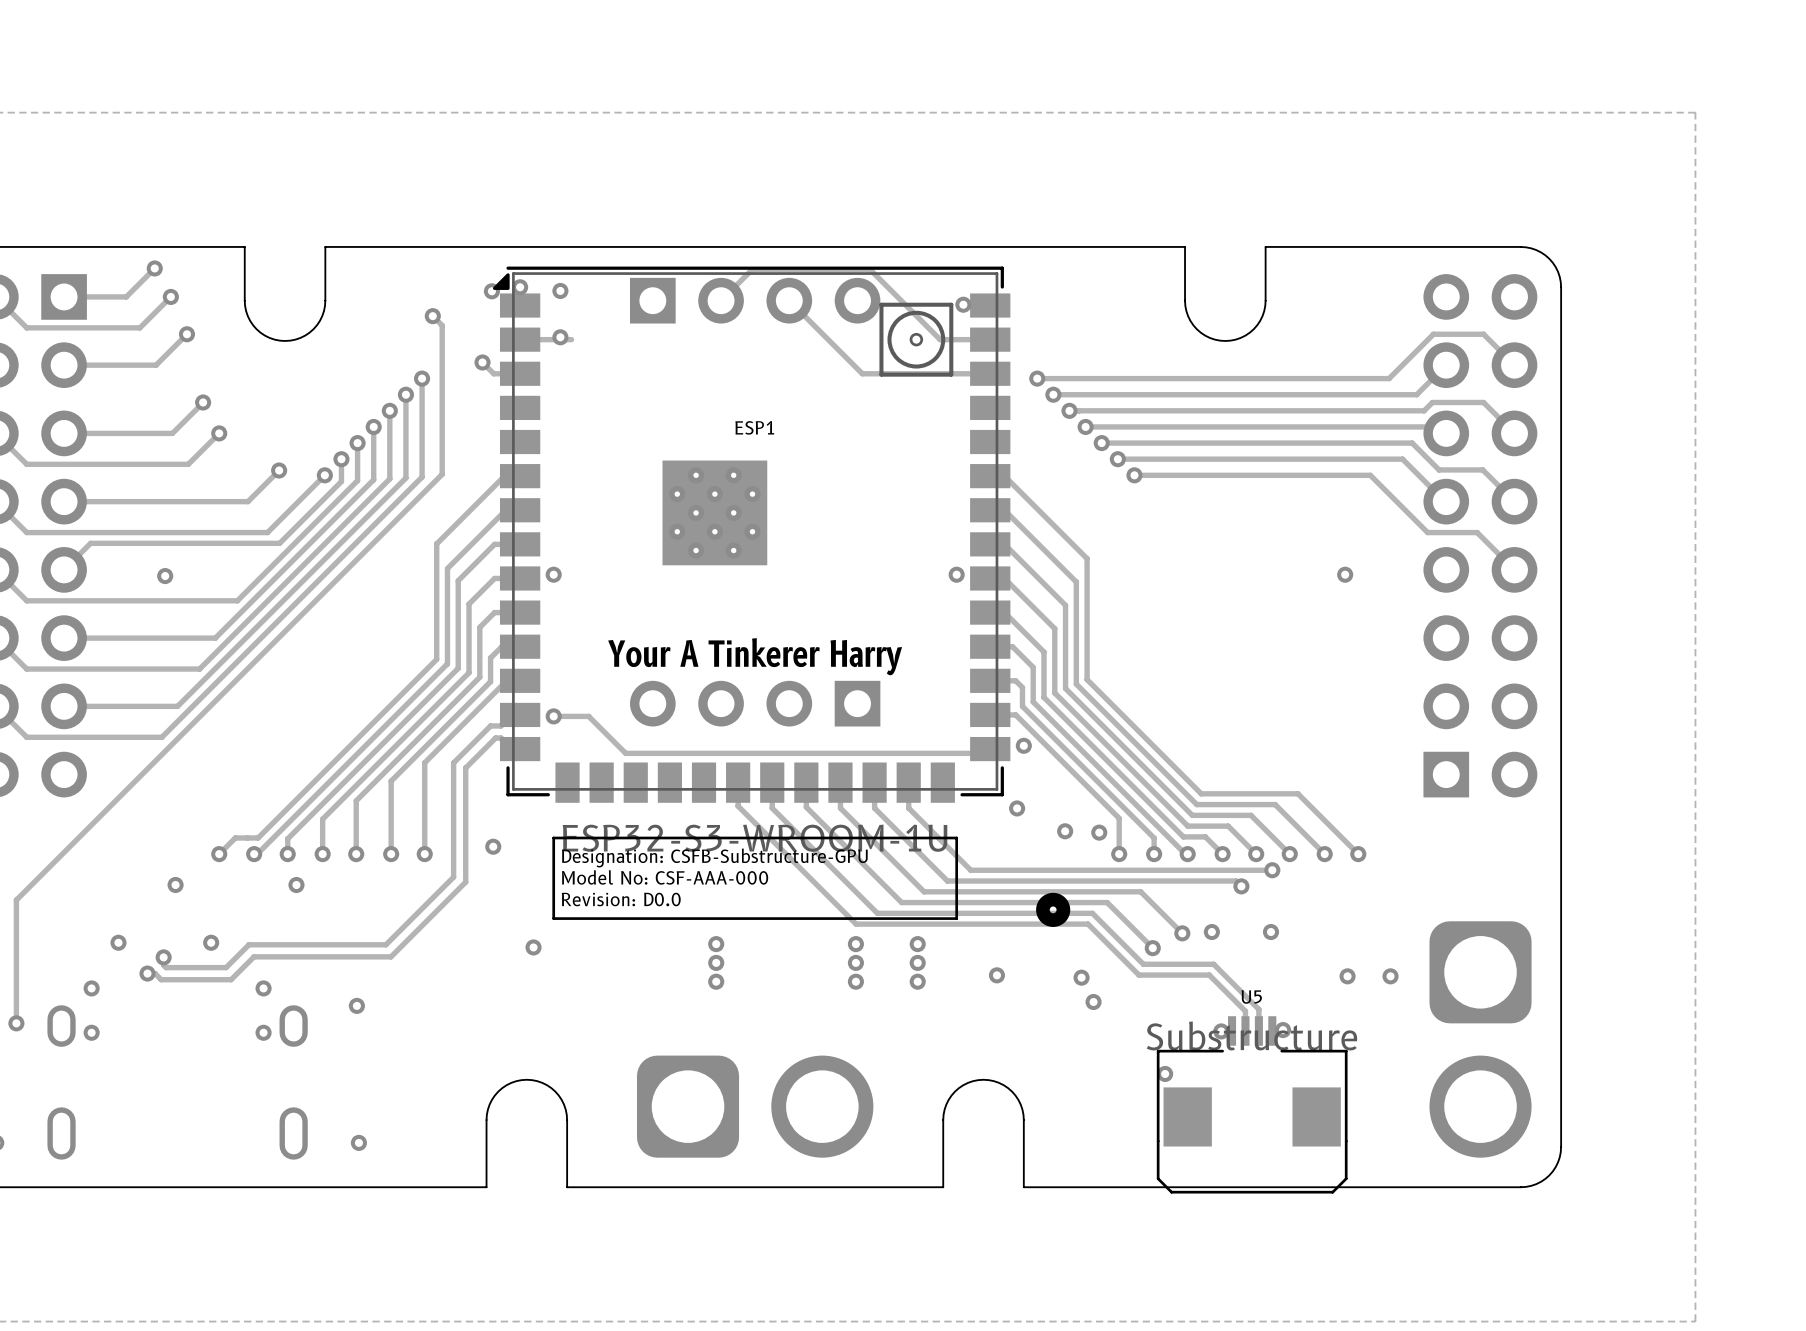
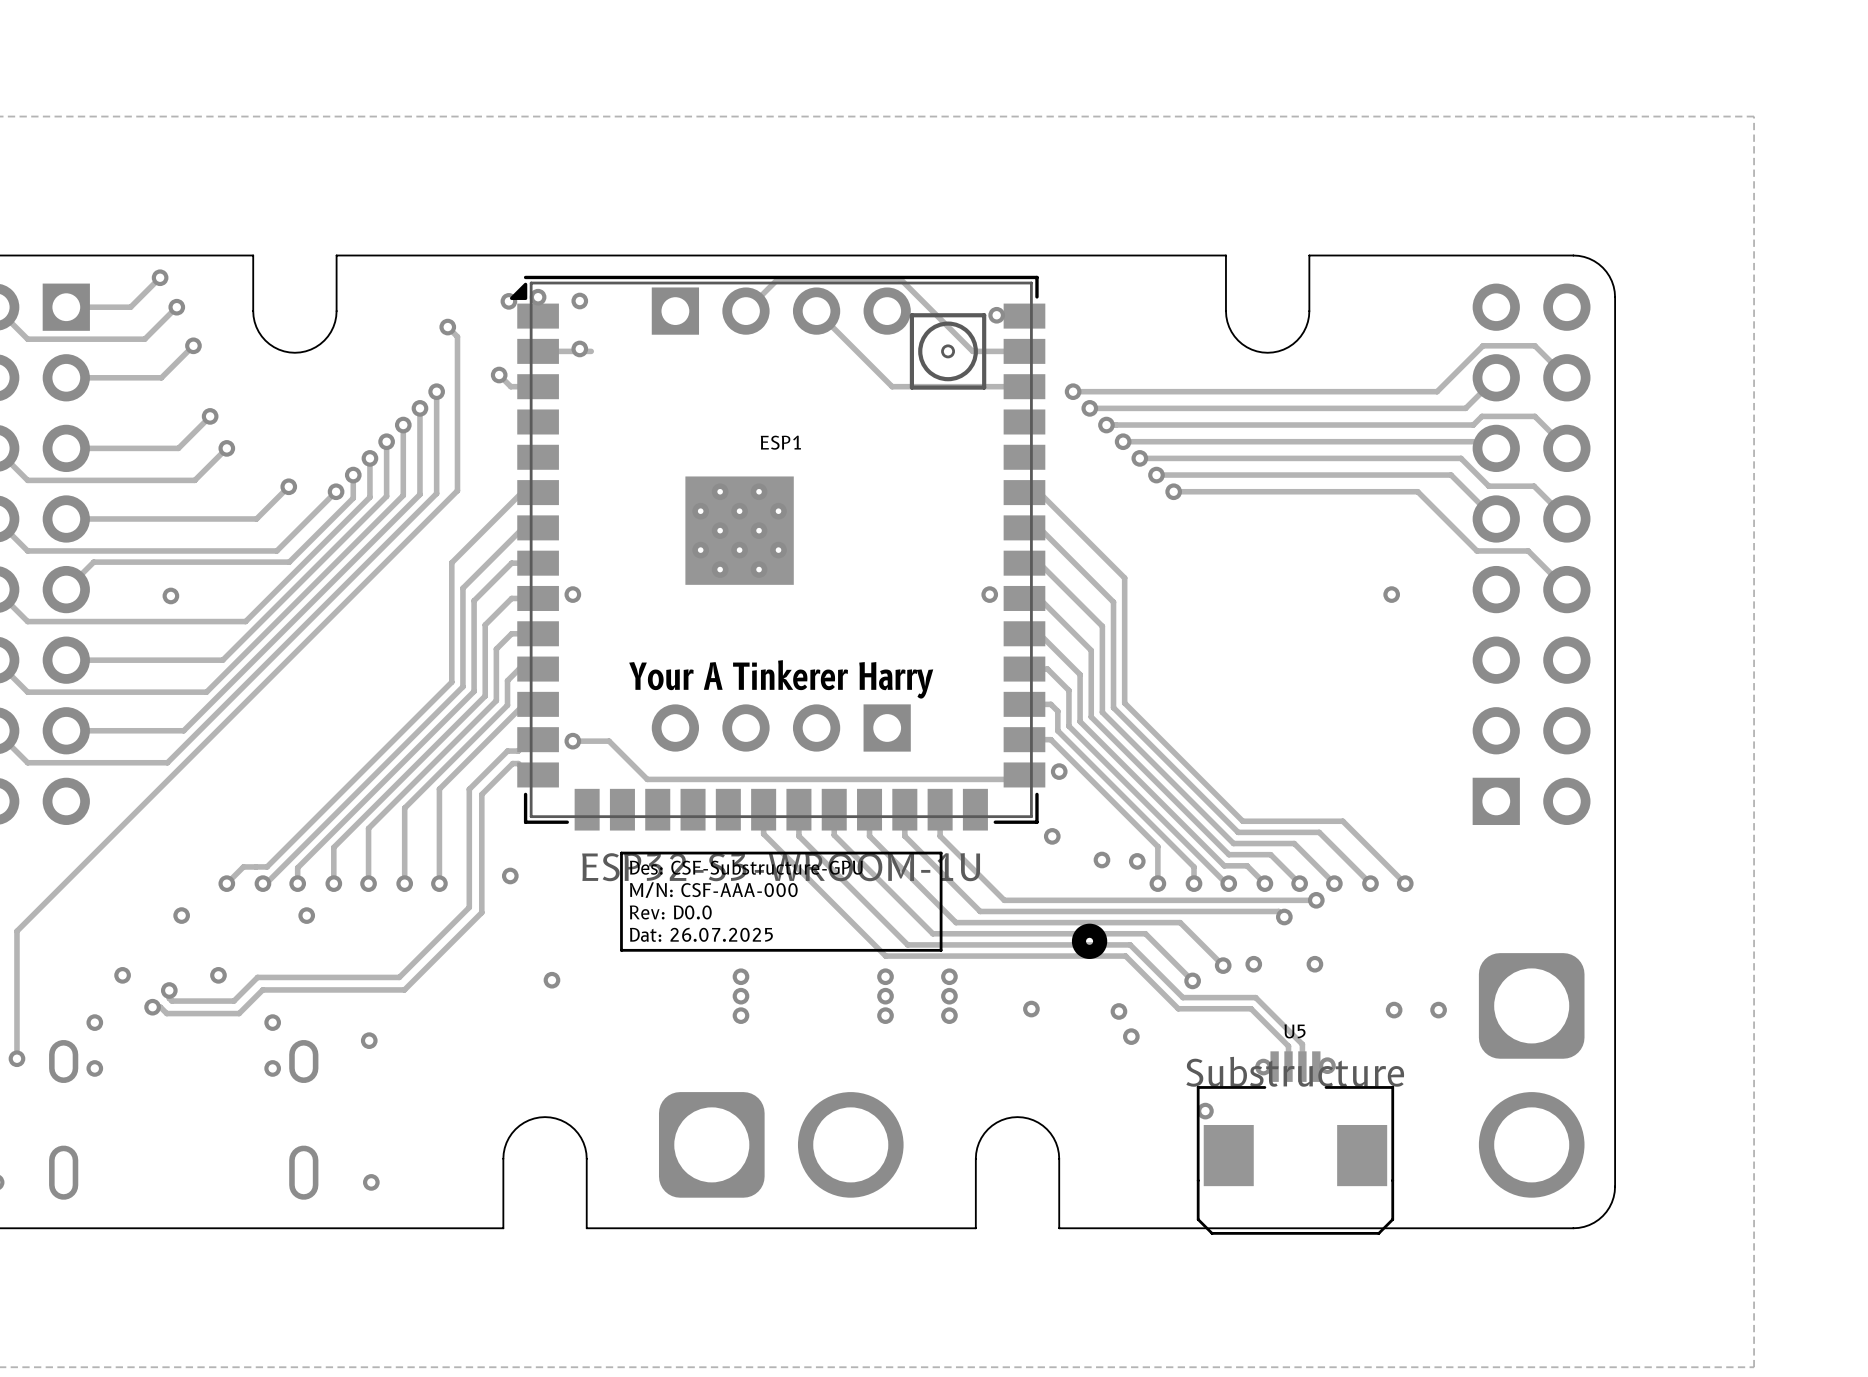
text: Designation: CSFB-Substructure-GPU (714, 858) -> Des: CSF-Substructure-GPU (746, 867)
text: Model No: CSF-AAA-000 (665, 877) -> M/N: CSF-AAA-000 (713, 890)
text: Revision: D0.0 (621, 899) -> Rev: D0.0 (670, 912)
text: none -> Dat: 26.07.2025 (701, 934)
line: (909, 918) (956, 918) (956, 837) (553, 837) (553, 918) (600, 918) -> (941, 950) (941, 853) (621, 853) (621, 950)

